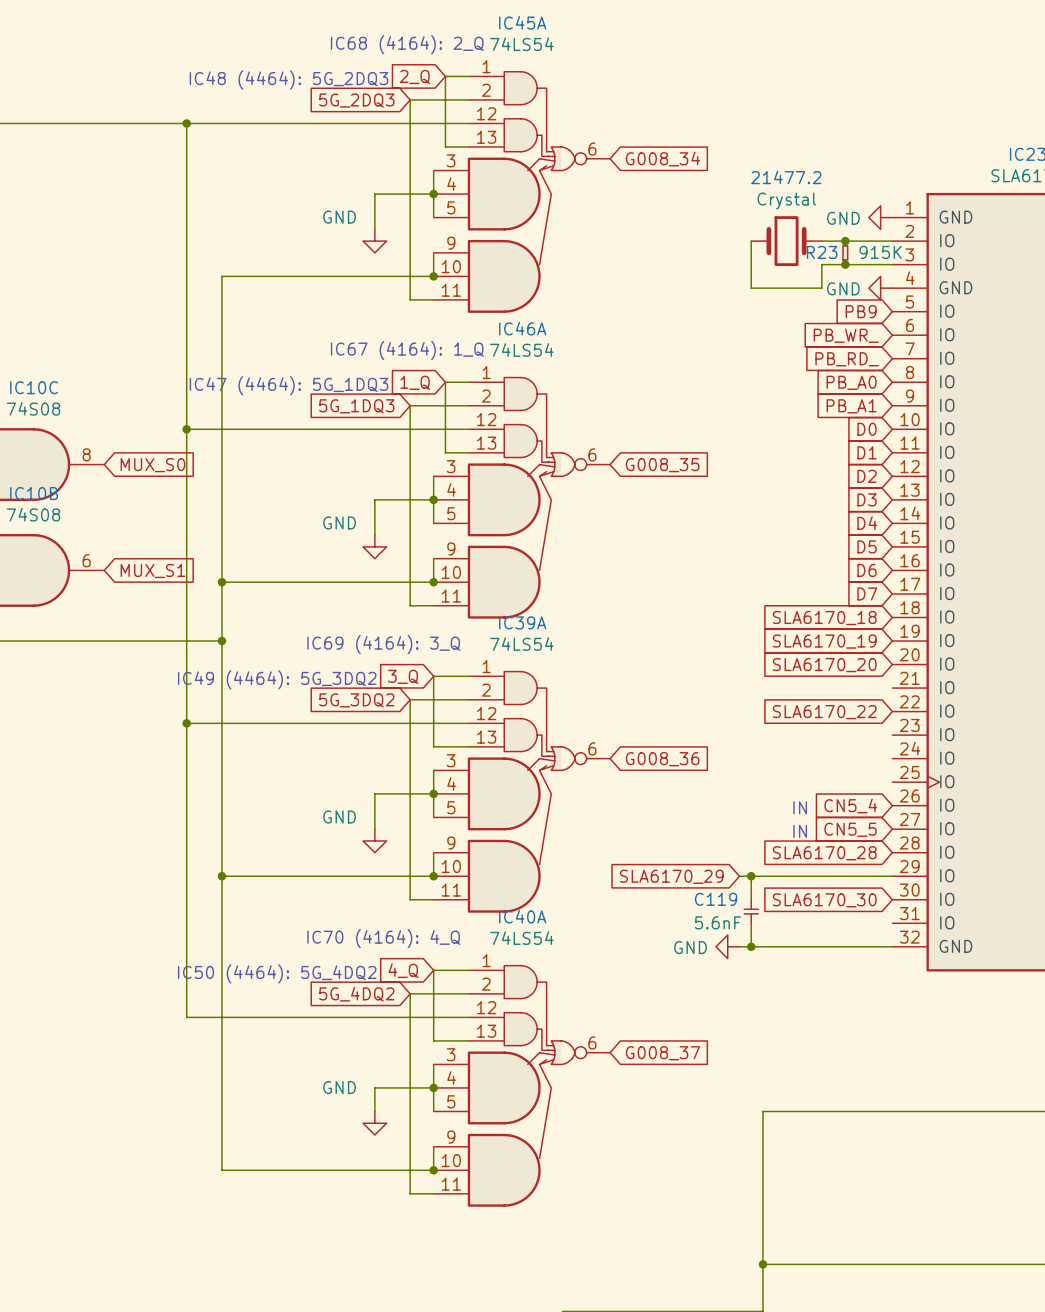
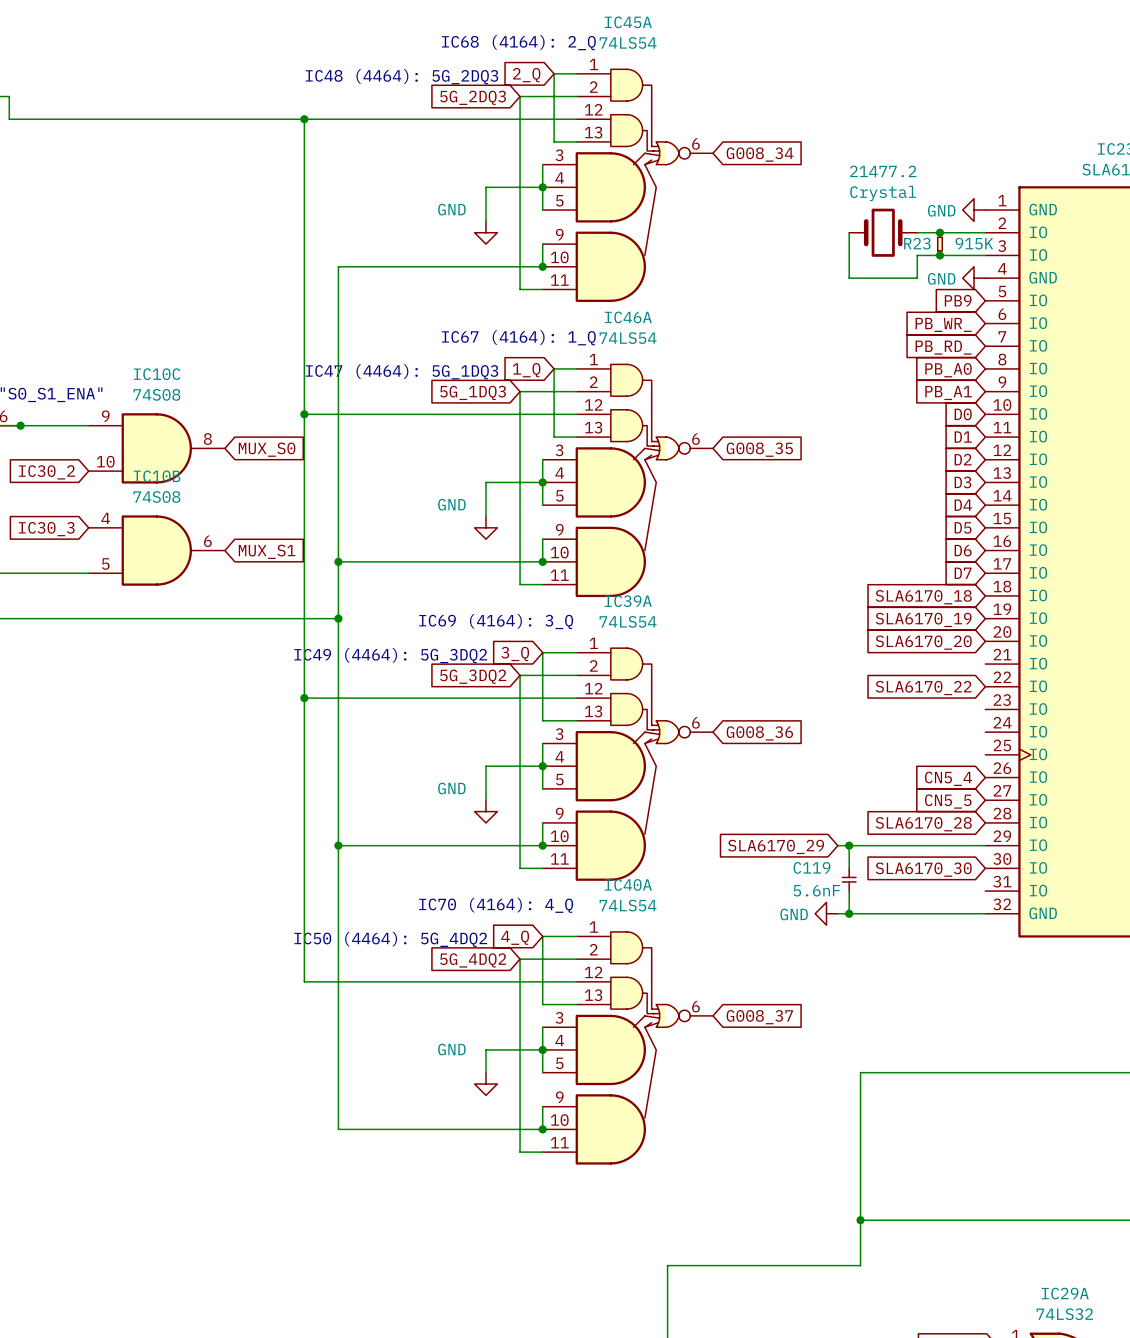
text: IN (800, 807) -> none
text: IN (800, 831) -> none

